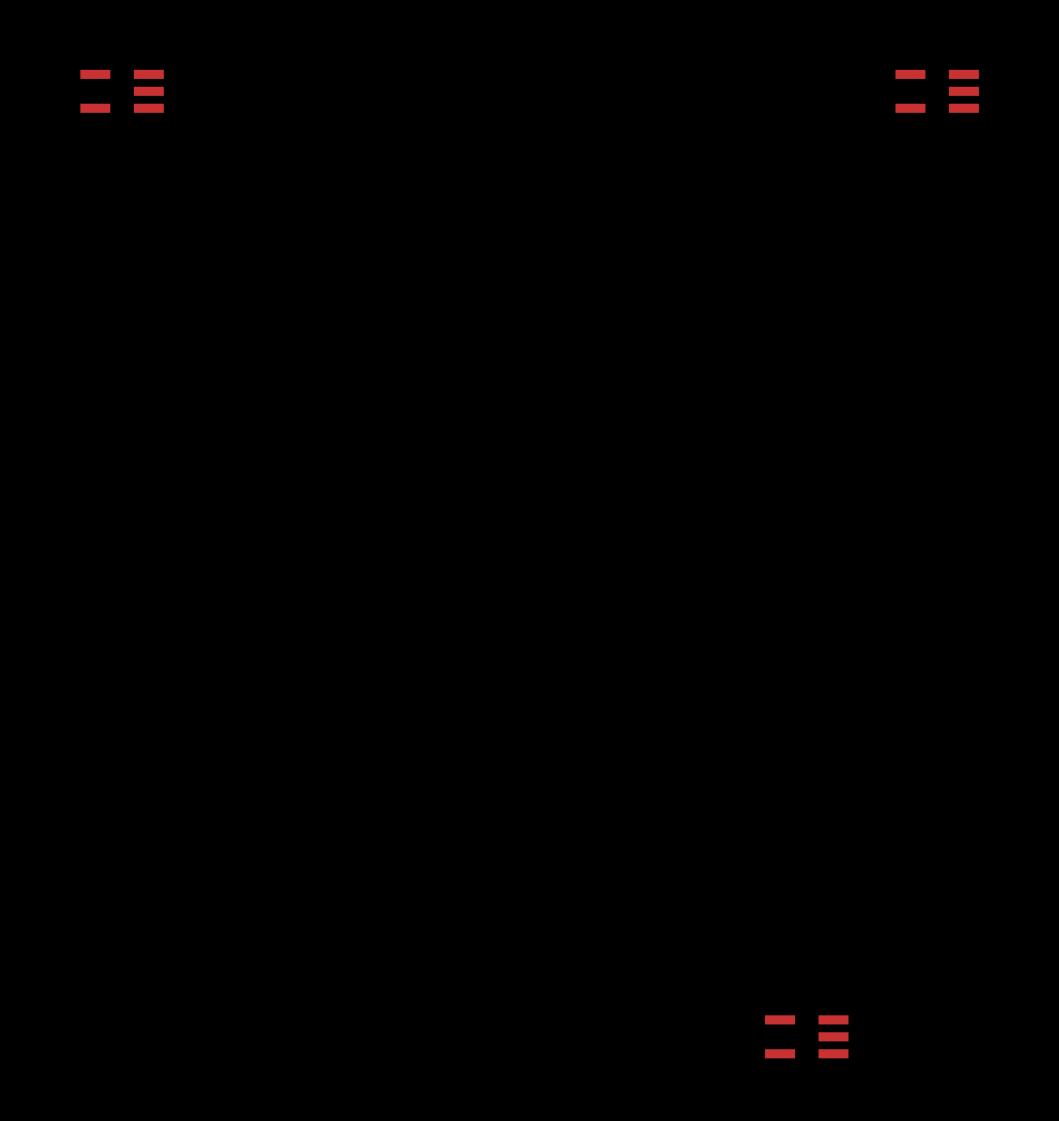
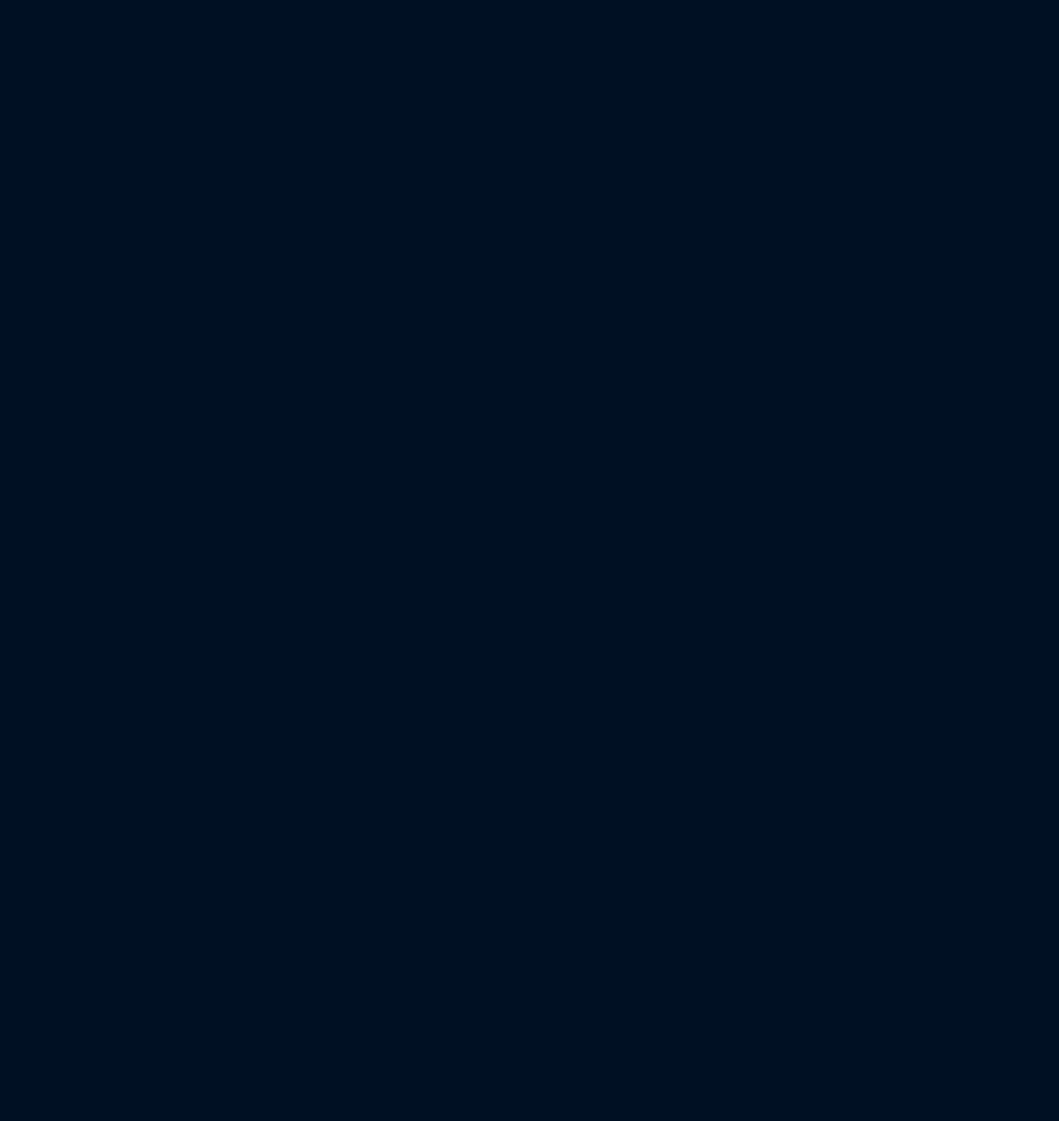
part: (122, 91) -> none
part: (937, 91) -> none
part: (806, 1036) -> none

